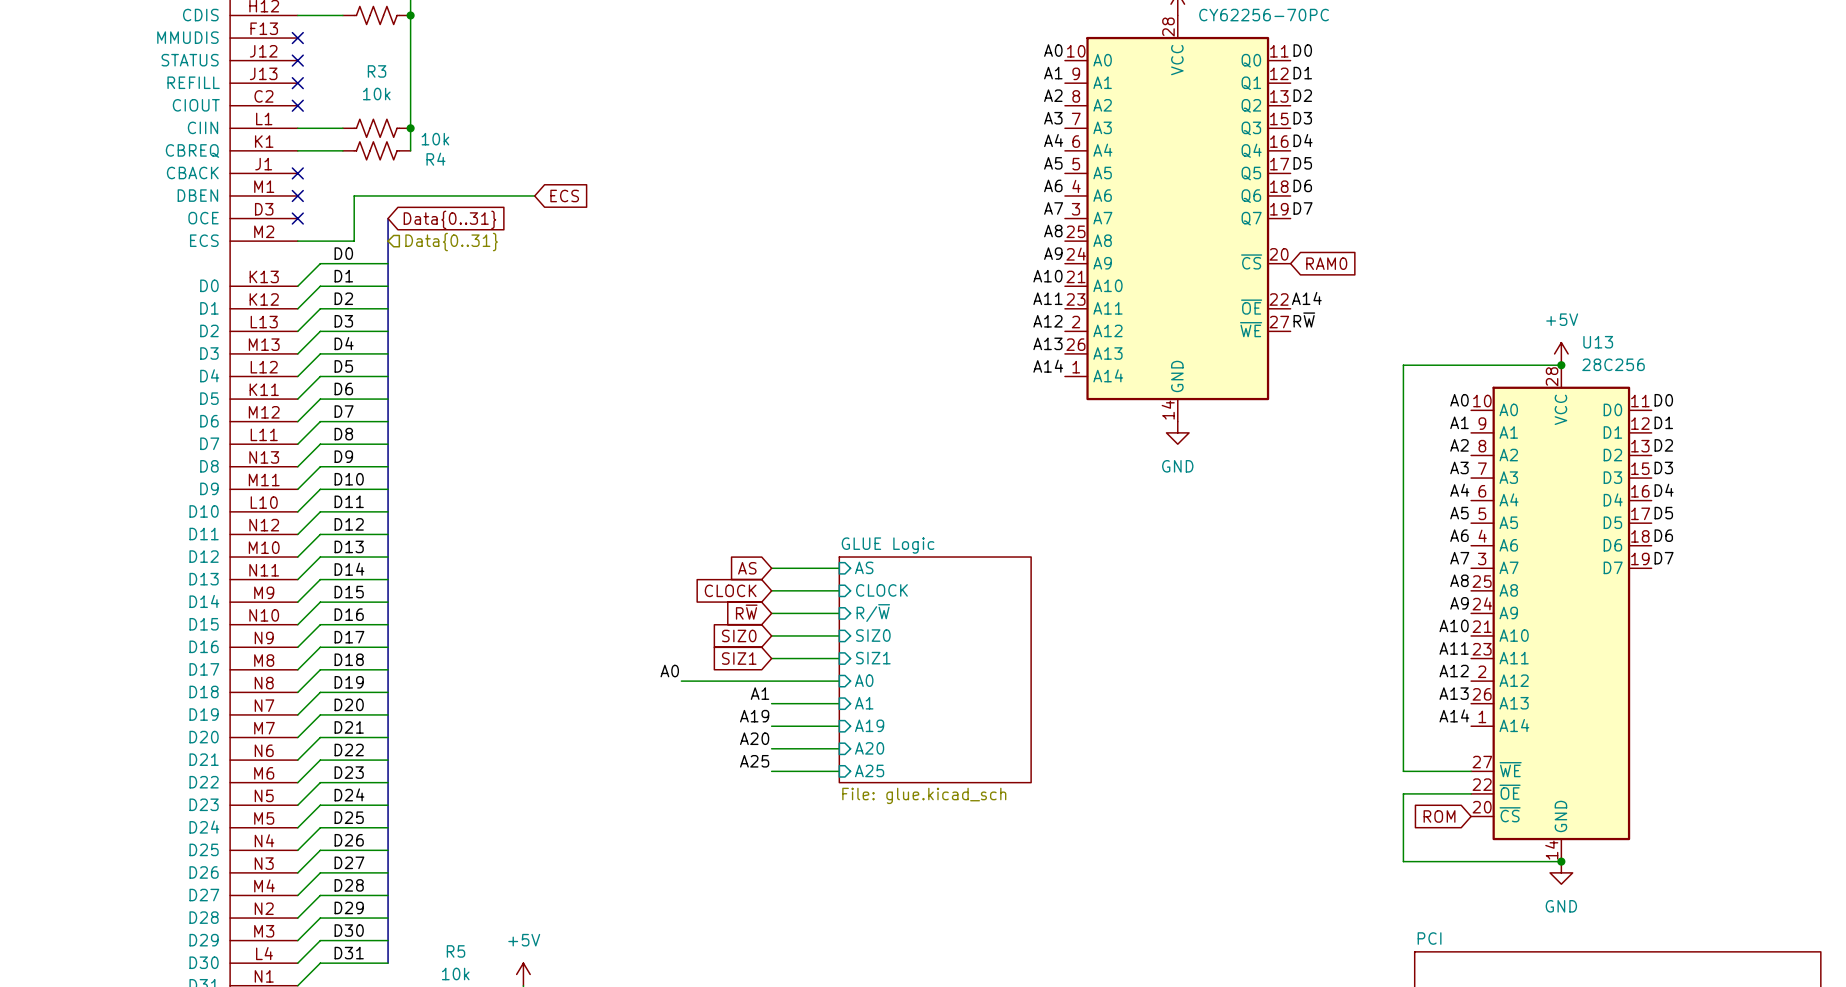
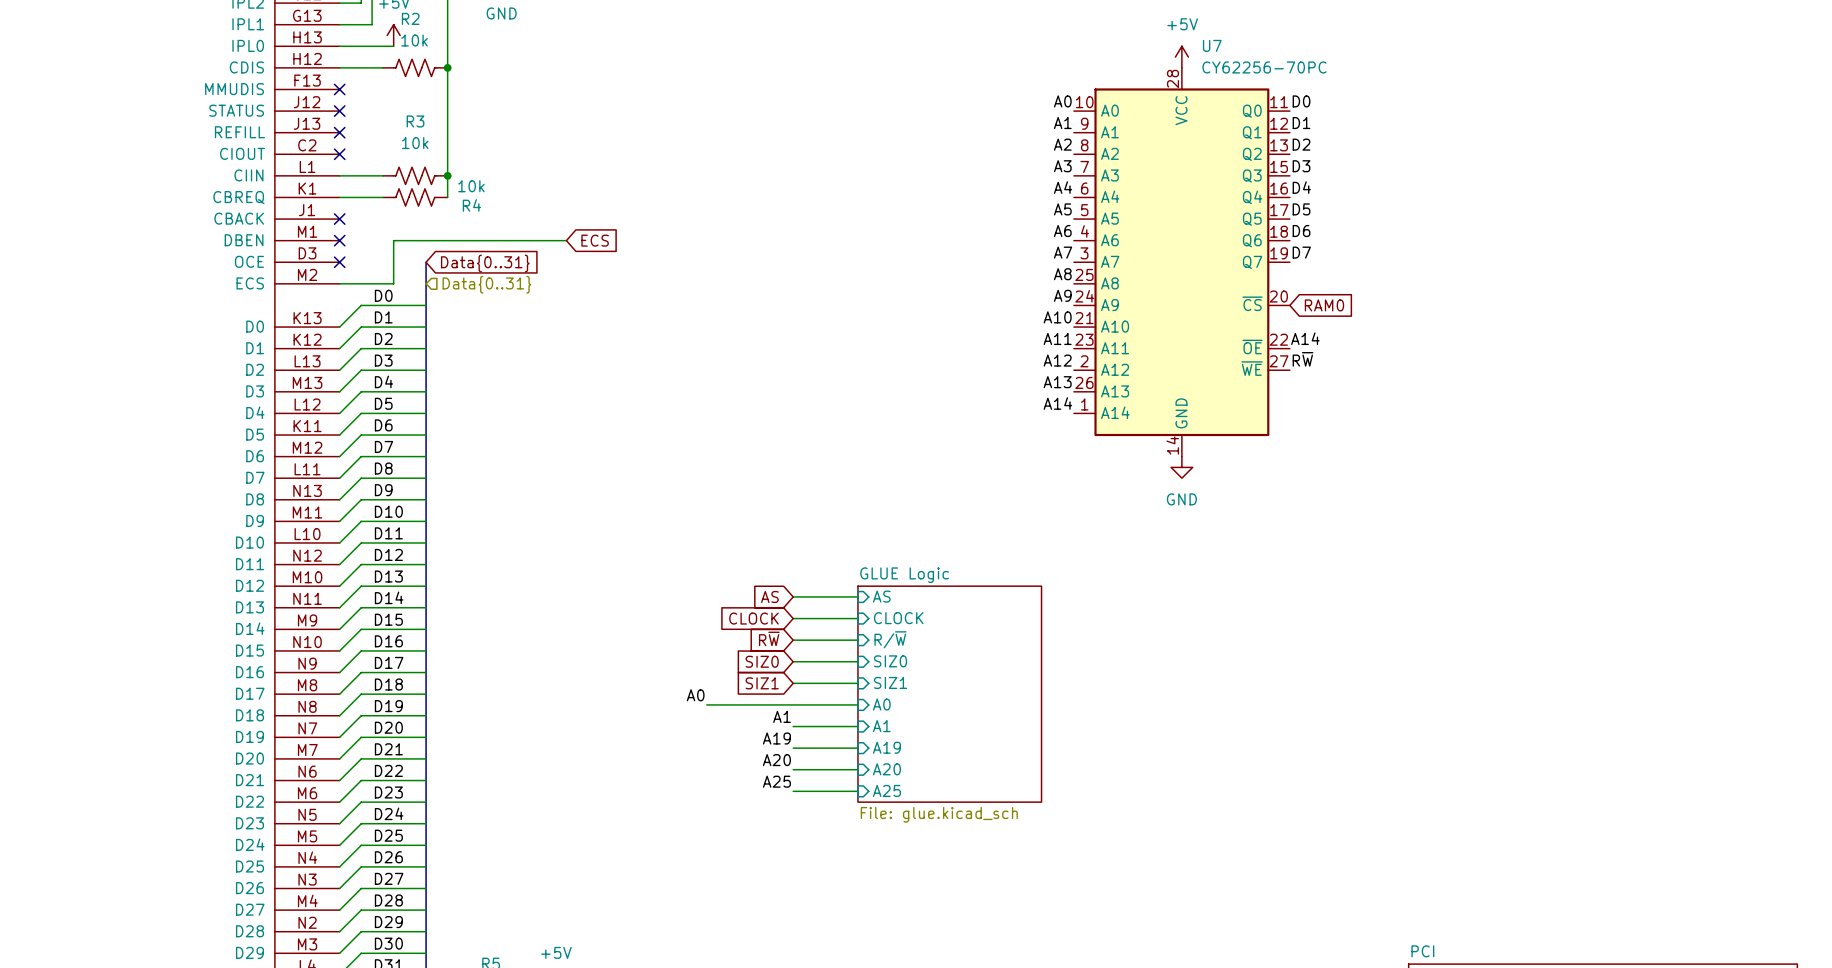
power symbol: +5V (1561, 353) -> none
wire: (1561, 365) (1403, 365) (1403, 771) (1471, 771) -> none
junction: (1561, 365) -> none
label: A0 (1459, 400) -> none
label: D0 (1663, 400) -> none
label: A1 (1459, 422) -> none
label: D1 (1663, 422) -> none
label: A2 (1459, 445) -> none
label: D2 (1663, 445) -> none
label: A3 (1459, 467) -> none
label: D3 (1663, 467) -> none
label: A4 (1459, 490) -> none
label: D4 (1664, 490) -> none
label: A5 (1459, 513) -> none
label: D5 (1663, 513) -> none
label: A6 (1459, 535) -> none
label: D6 (1663, 535) -> none
label: A7 (1459, 558) -> none
label: D7 (1664, 558) -> none
label: A8 (1459, 580) -> none
label: A9 (1459, 603) -> none
U13: 28C256 (1561, 613) -> none
label: A10 (1454, 625) -> none
label: A11 (1454, 648) -> none
label: A12 (1454, 671) -> none
label: A13 (1454, 693) -> none
label: A14 (1454, 715) -> none
wire: (1471, 793) (1403, 793) (1403, 861) (1561, 861) -> none
global label: ROM (1439, 816) -> none
junction: (1561, 861) -> none
power symbol: GND (1561, 872) -> none

